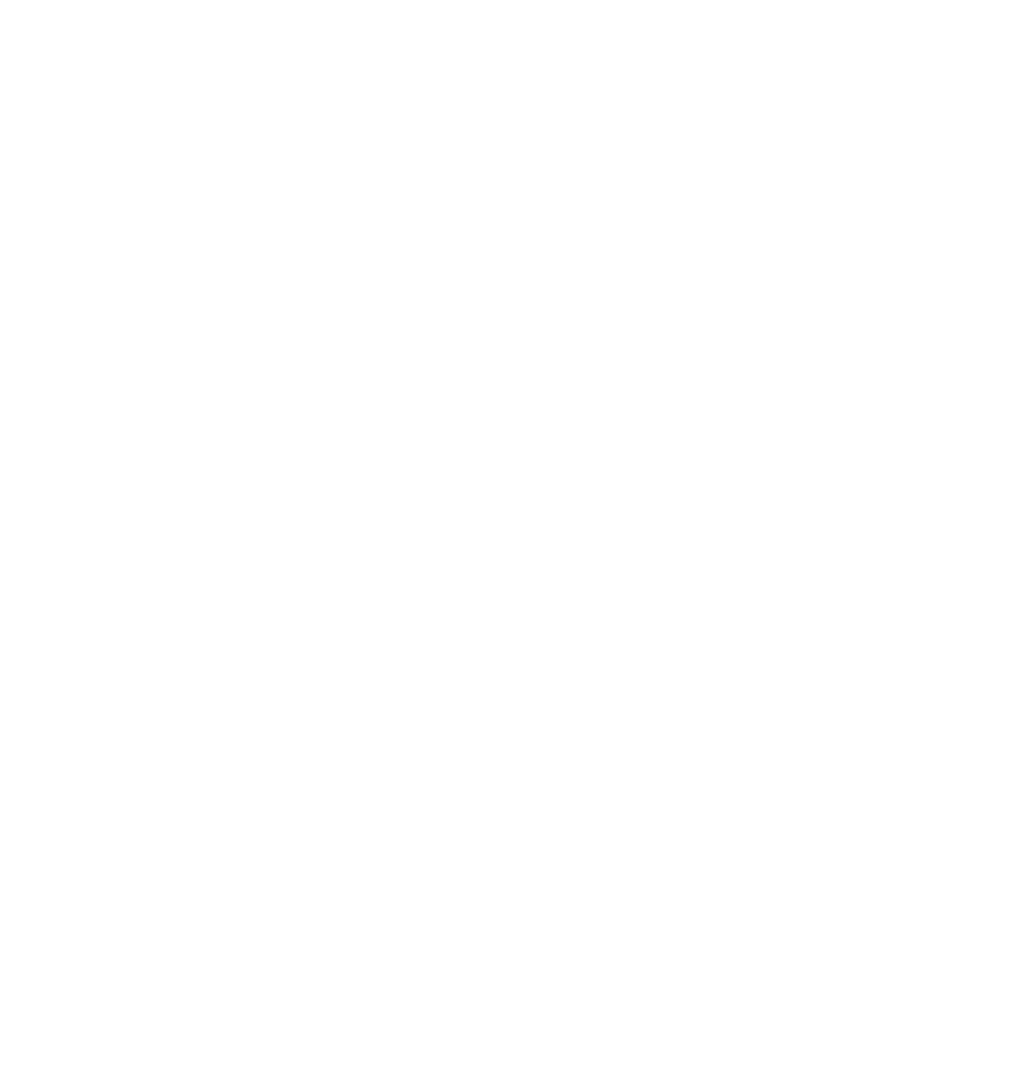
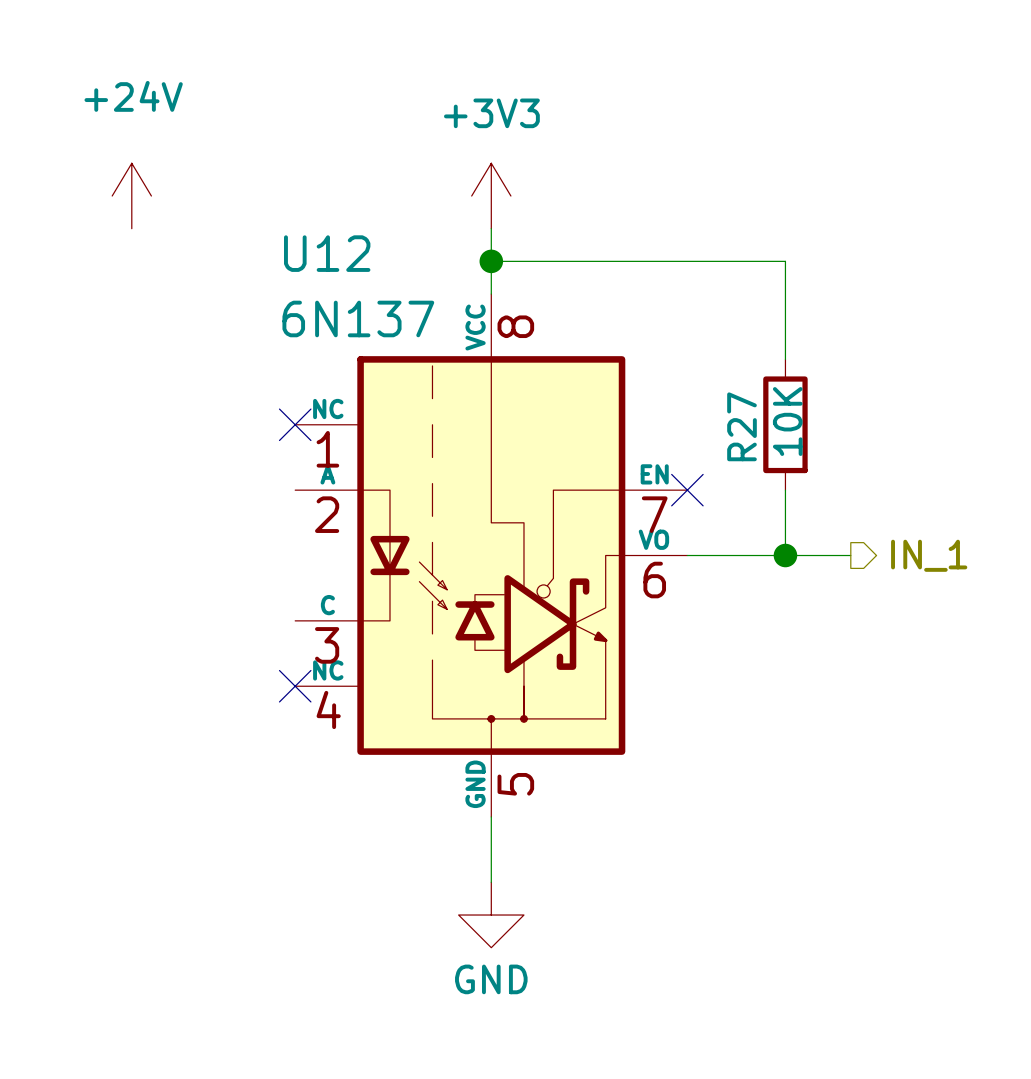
power symbol: none -> +24V (131, 196)
power symbol: none -> +3V3 (491, 196)
wire: none -> (491, 228) (491, 294)
wire: none -> (491, 261) (785, 261) (785, 359)
junction: none -> (491, 261)
no-connect mark: none -> (295, 424)
R27: none -> 10K (785, 424)
no-connect mark: none -> (687, 490)
wire: none -> (785, 490) (785, 555)
U12: none -> 6N137 (491, 555)
wire: none -> (687, 555) (850, 555)
junction: none -> (785, 555)
hierarchical label: none -> IN_1 (929, 555)
no-connect mark: none -> (295, 686)
wire: none -> (491, 816) (491, 882)
power symbol: none -> GND (491, 915)

